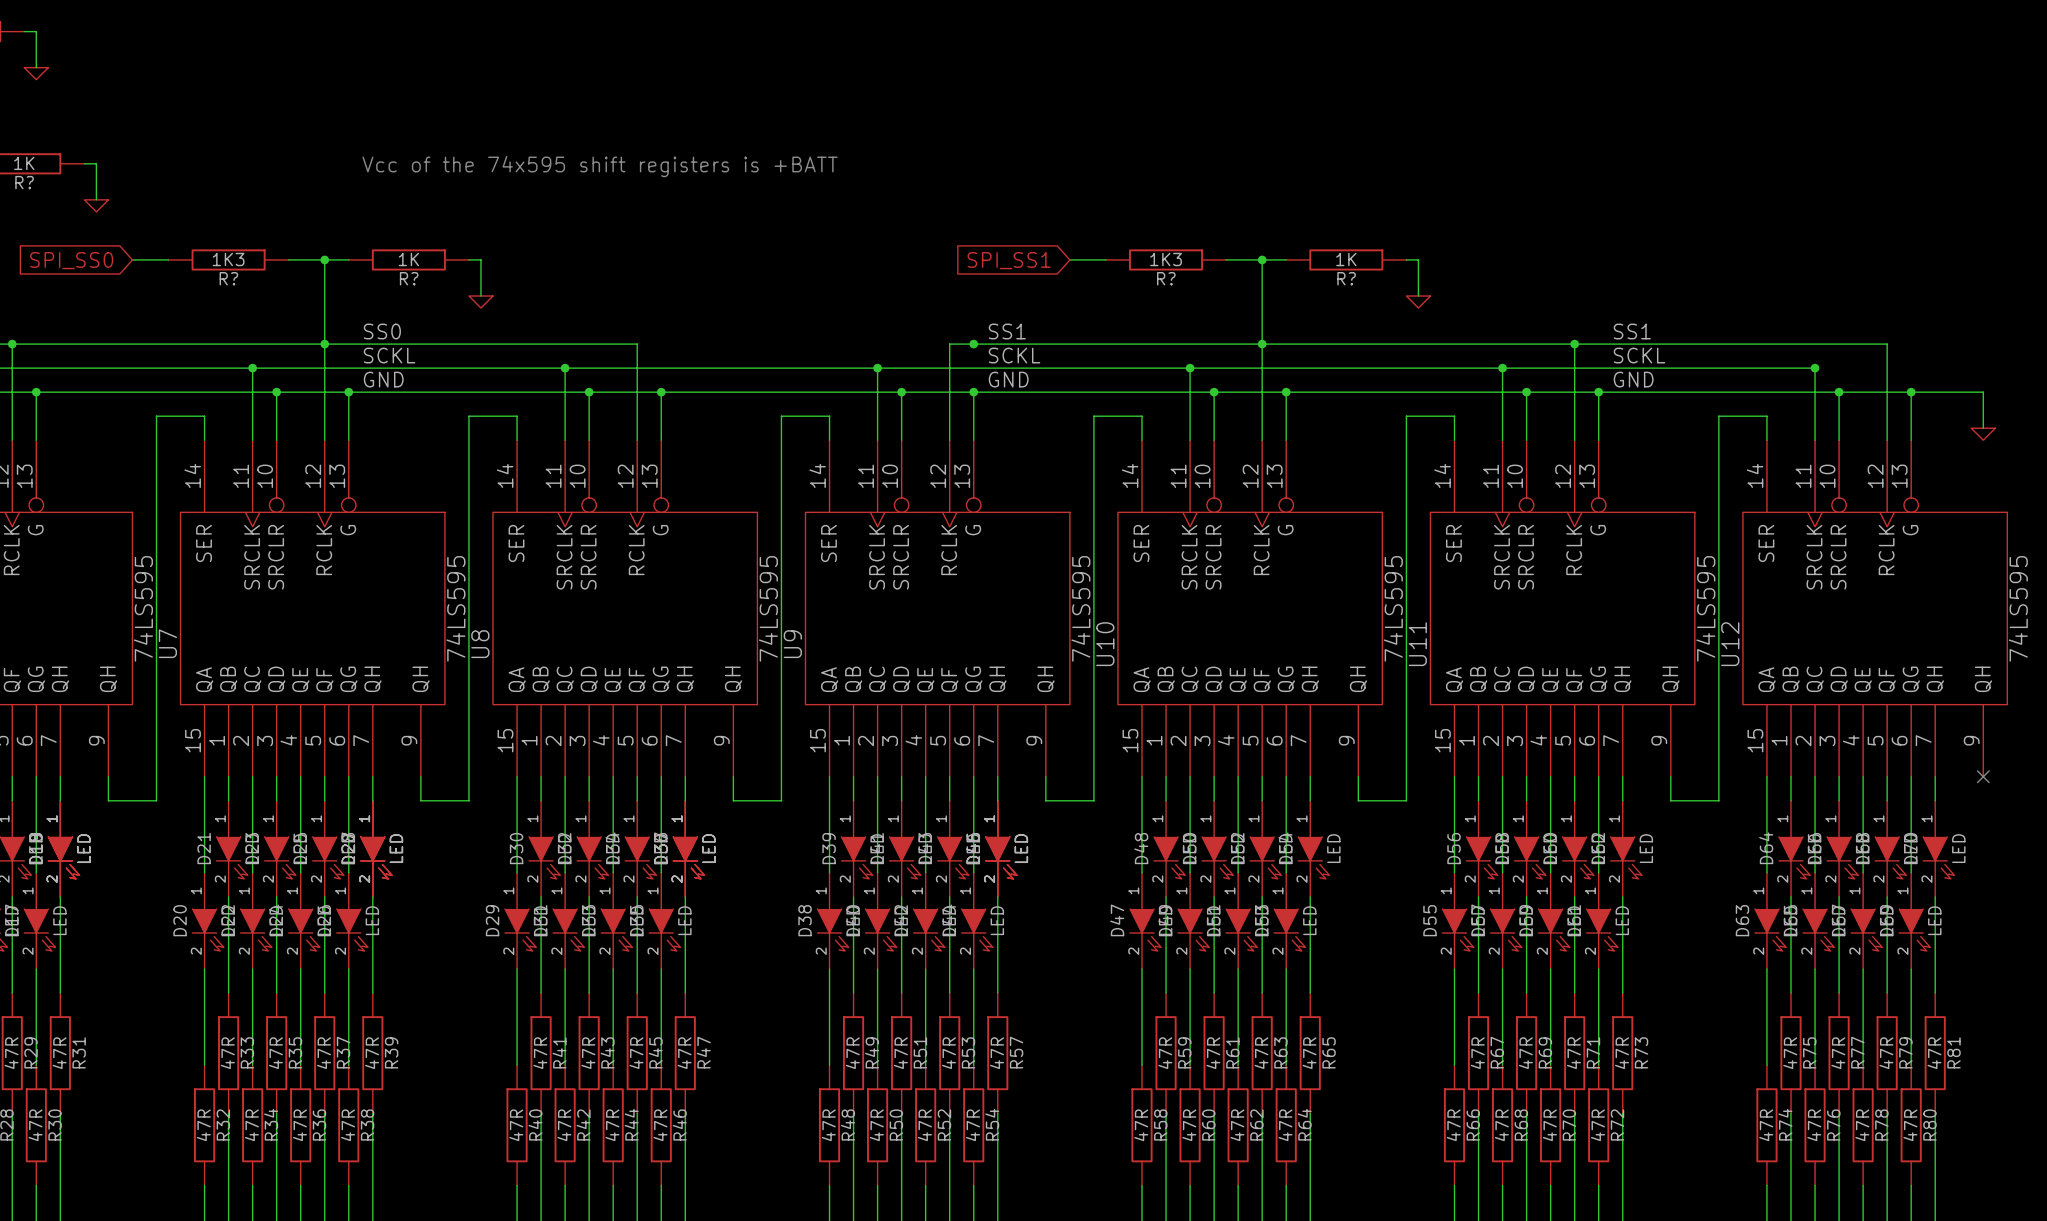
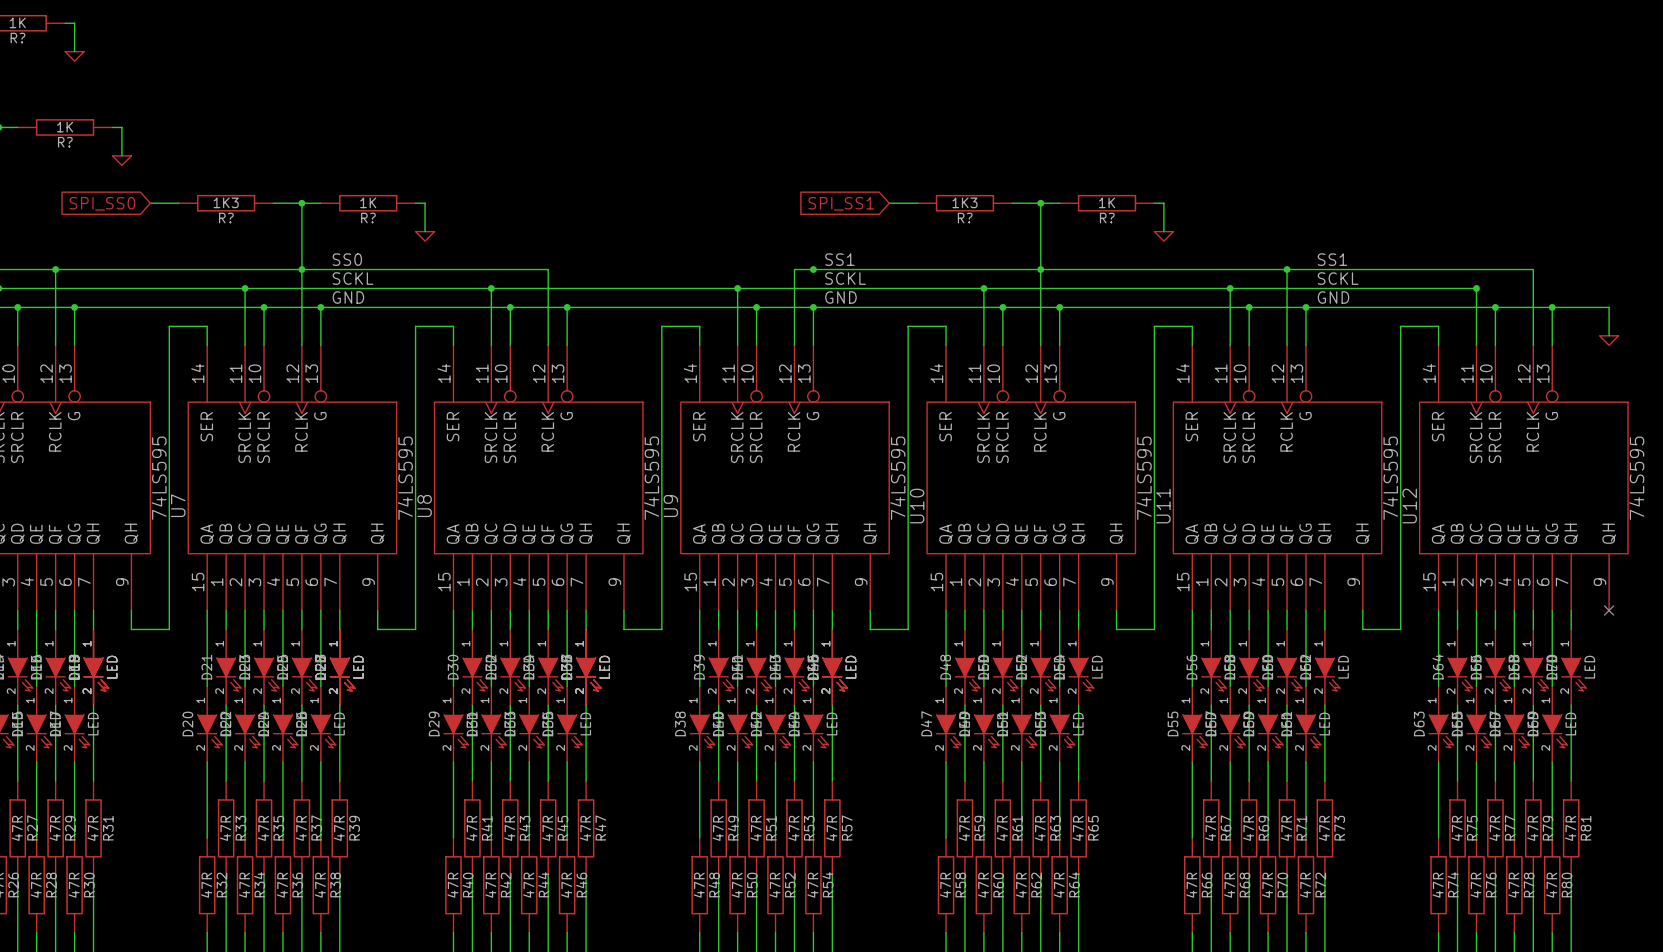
text: Vcc of the 74x595 shift registers is +BATT (600, 166) -> none

